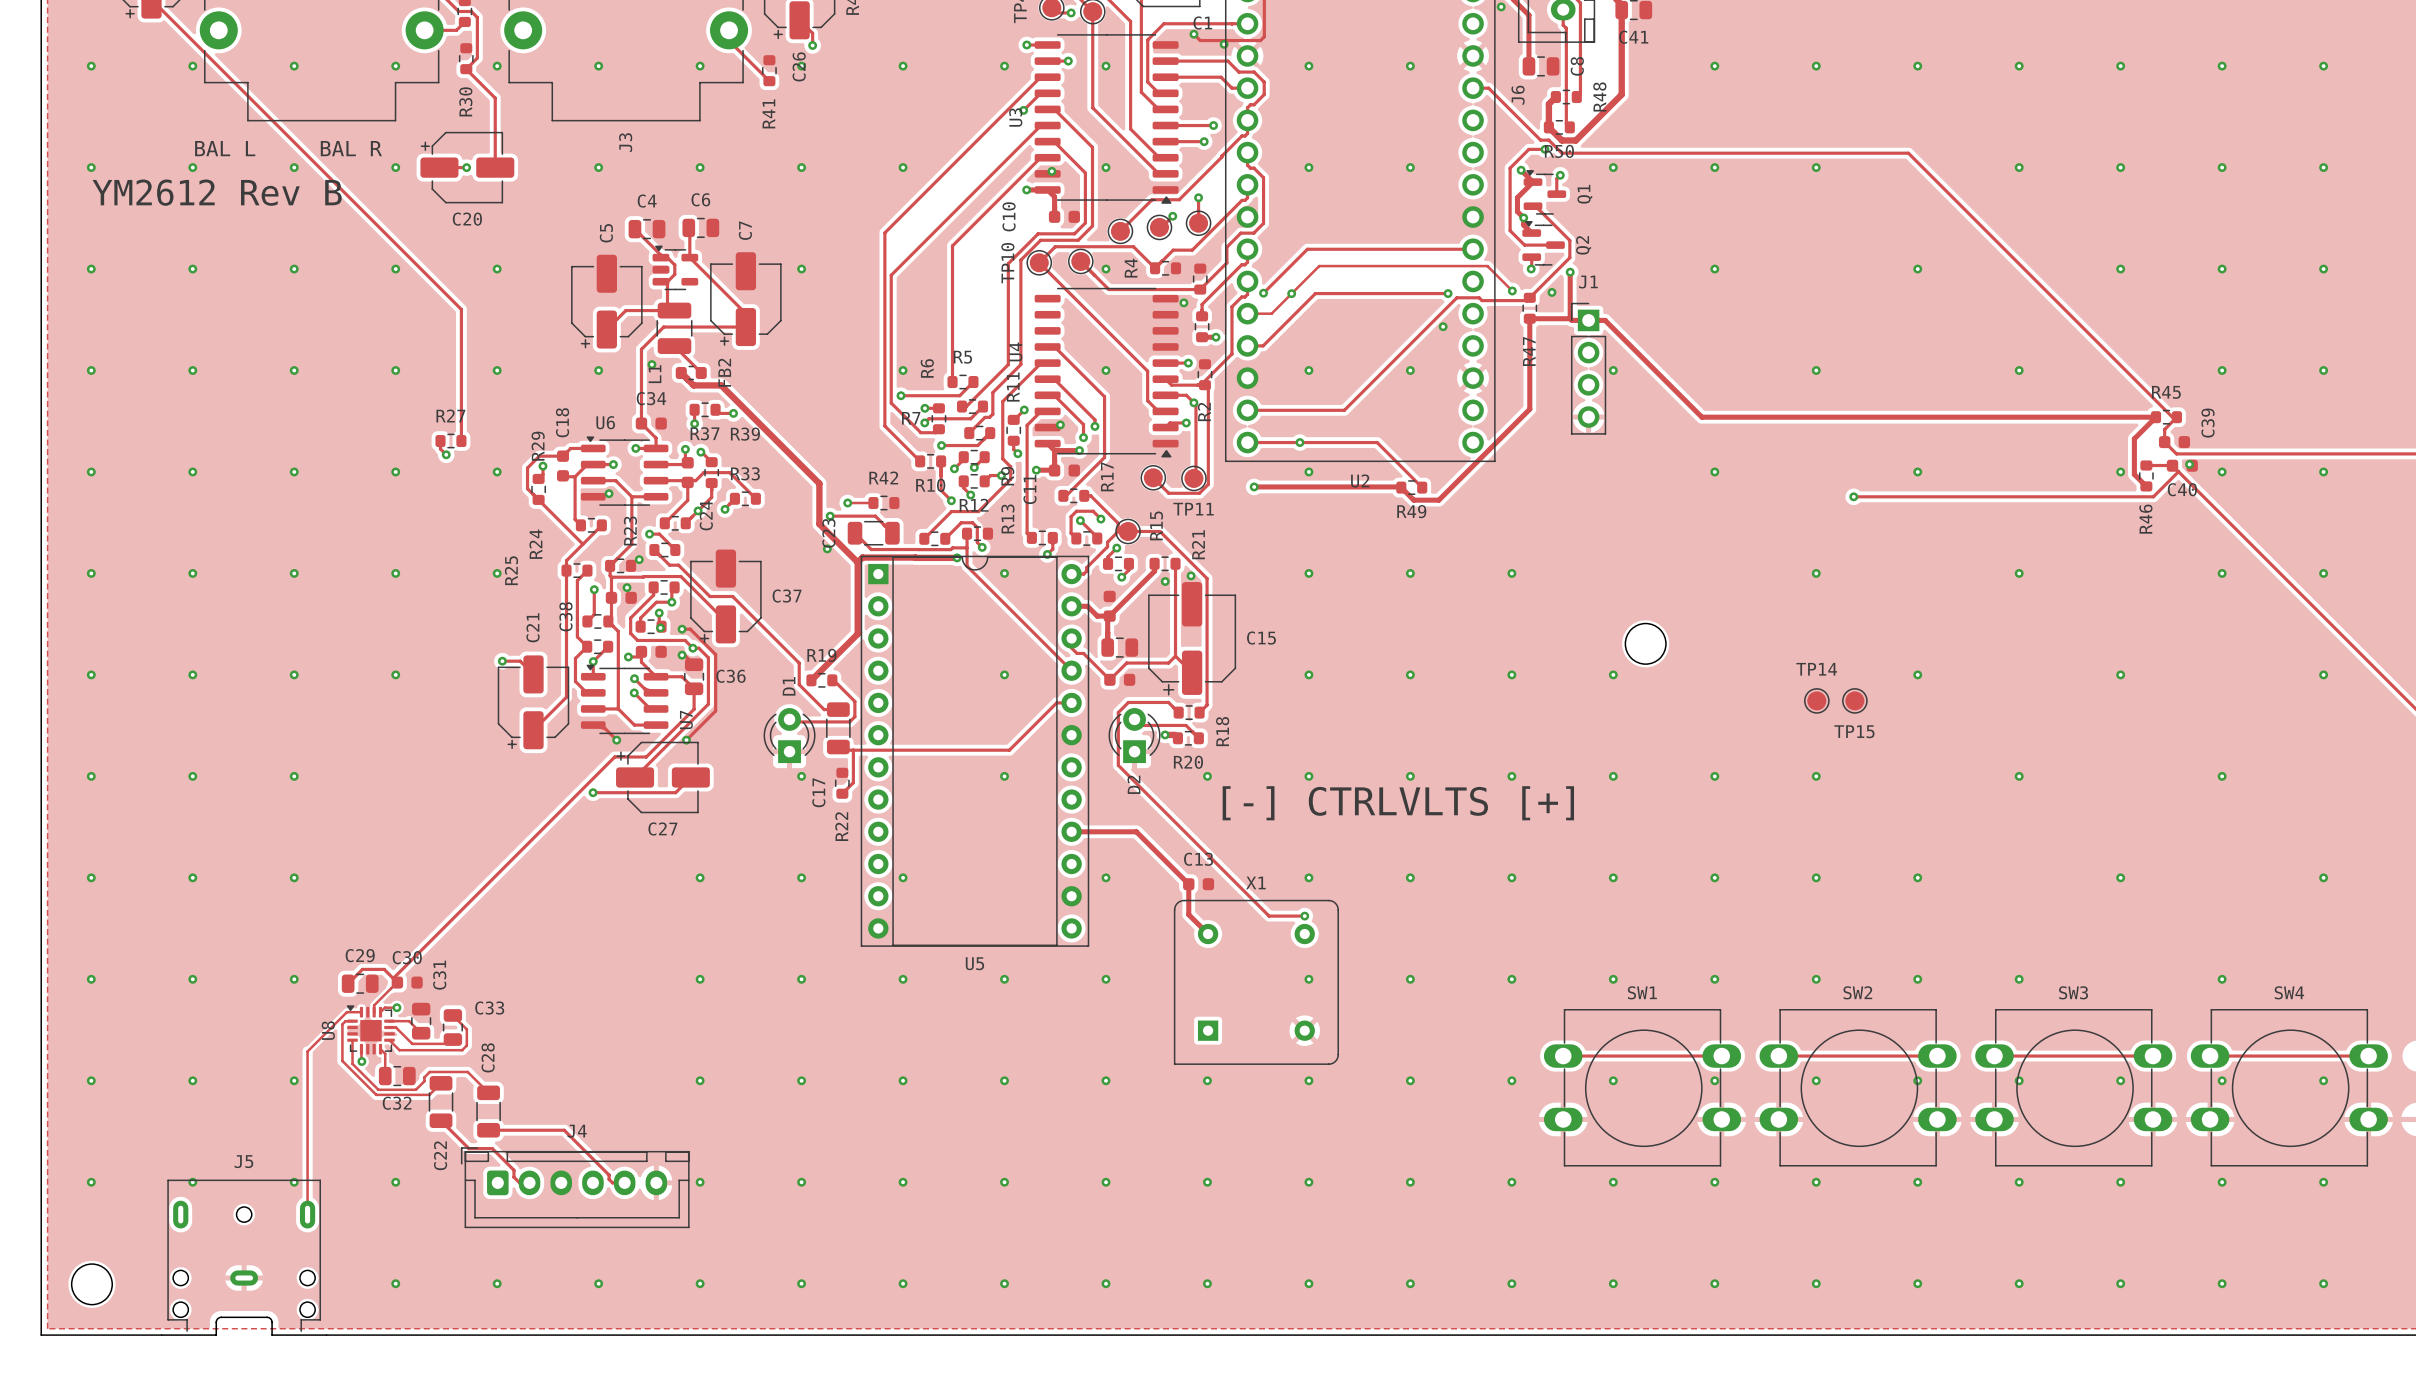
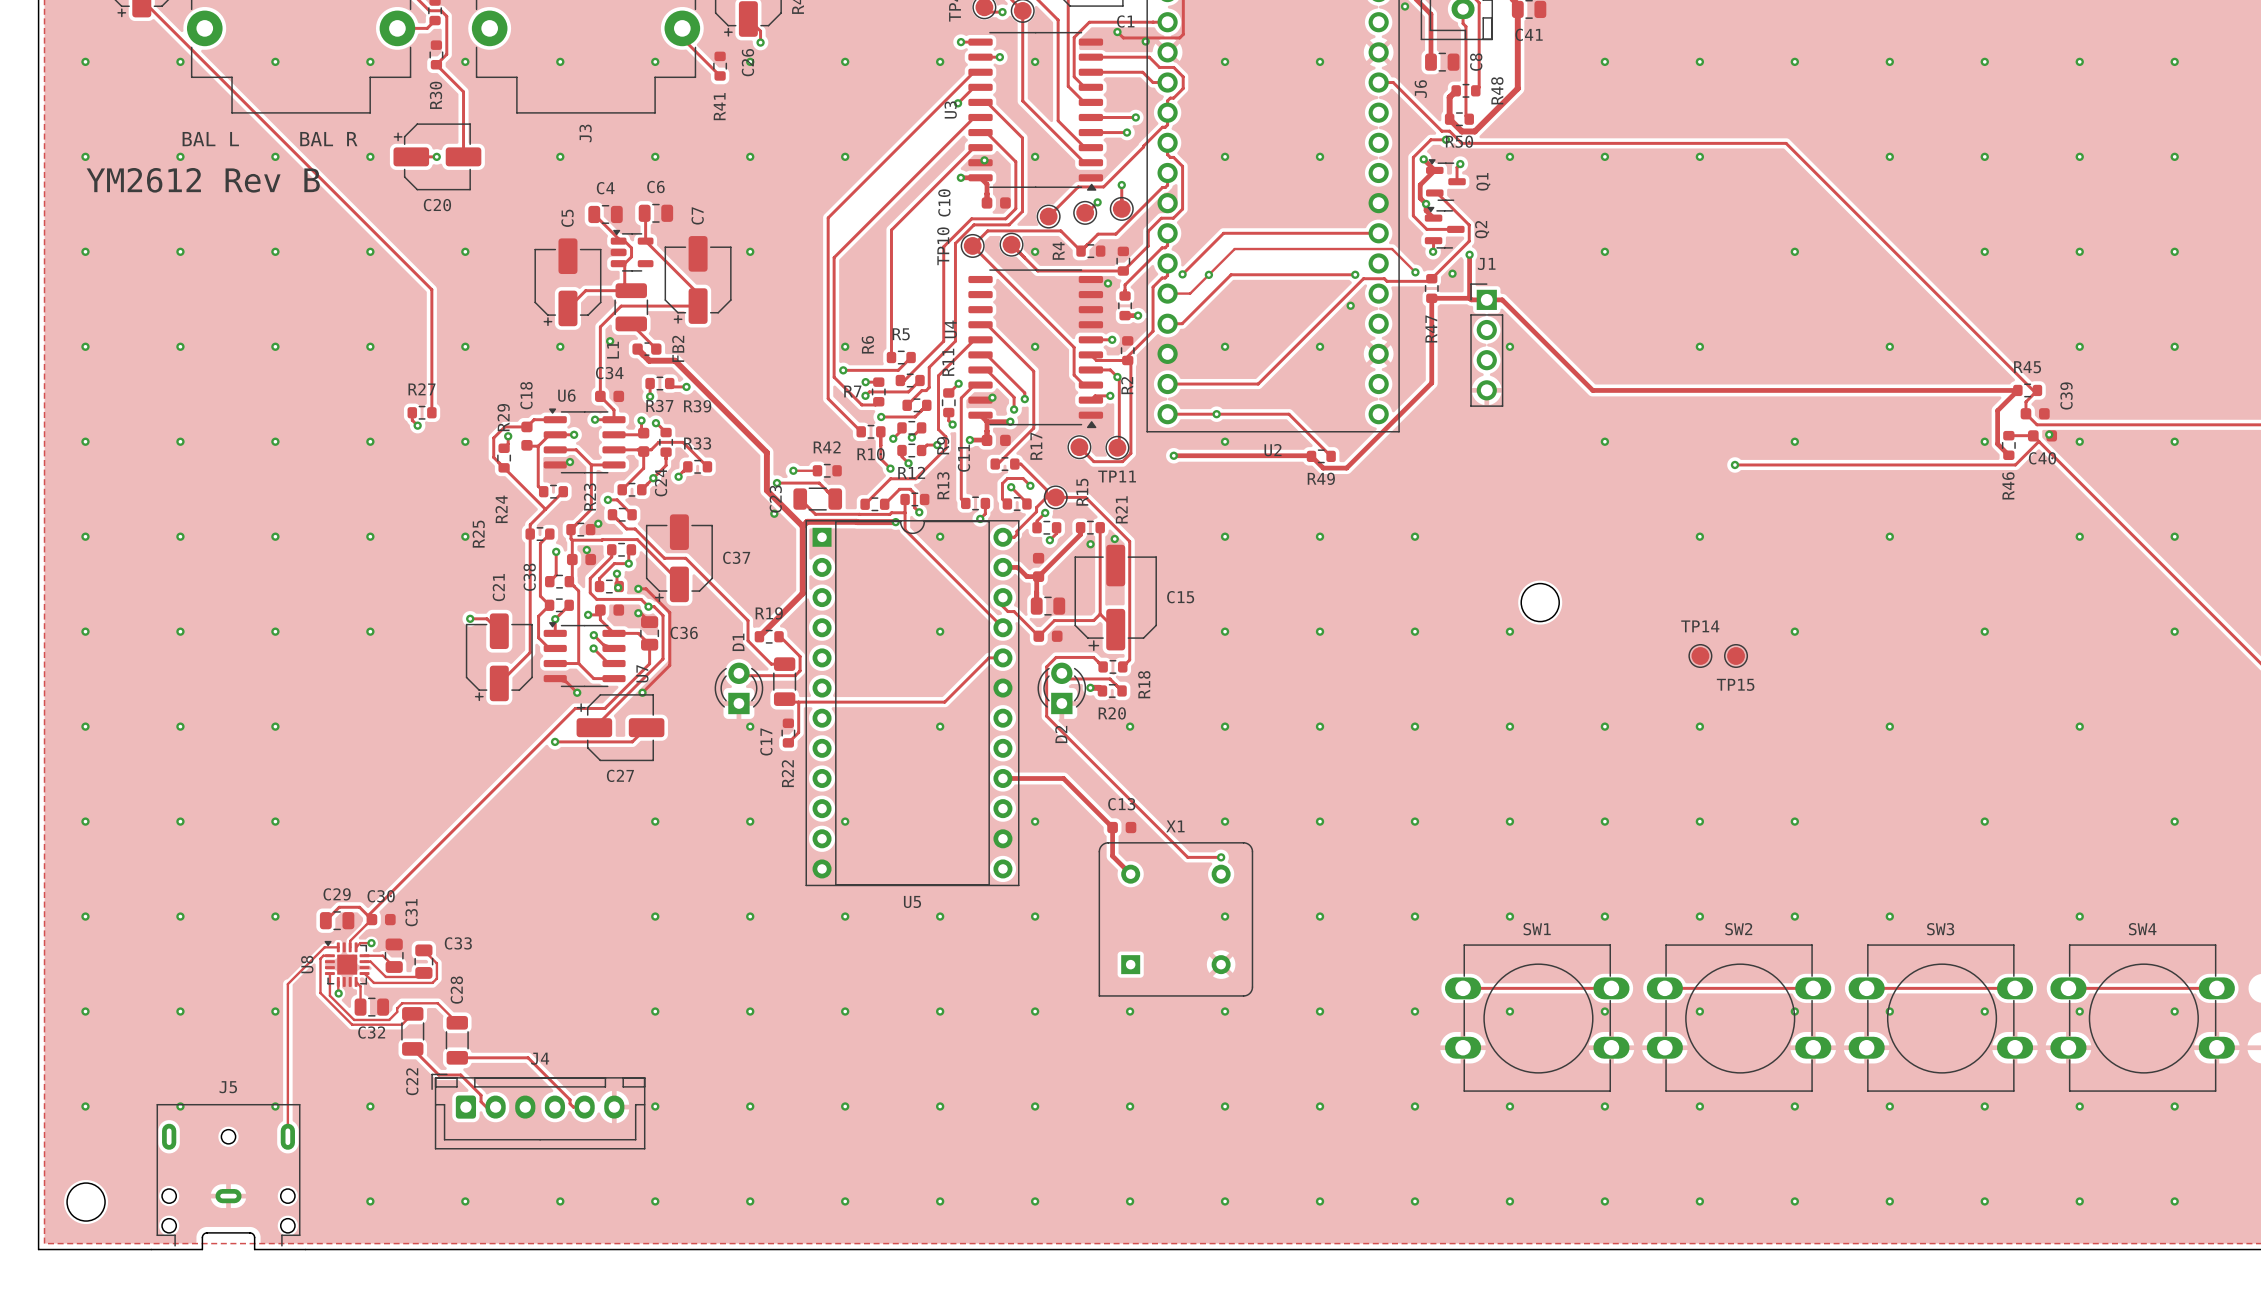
text: [-] CTRLVLTS [+] (1398, 803) -> none

